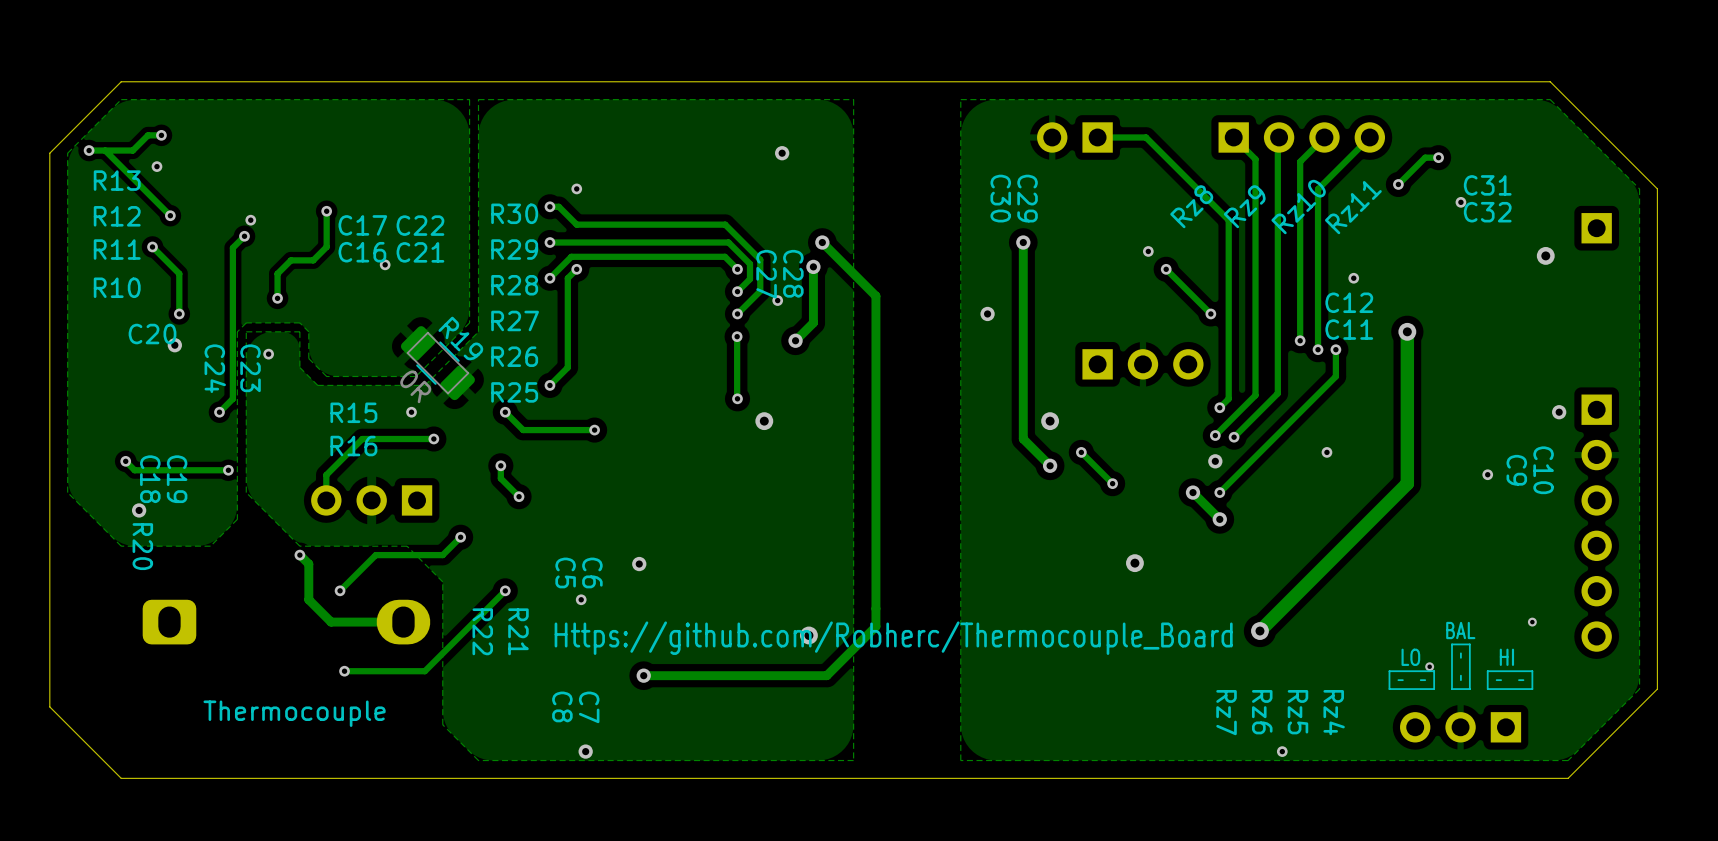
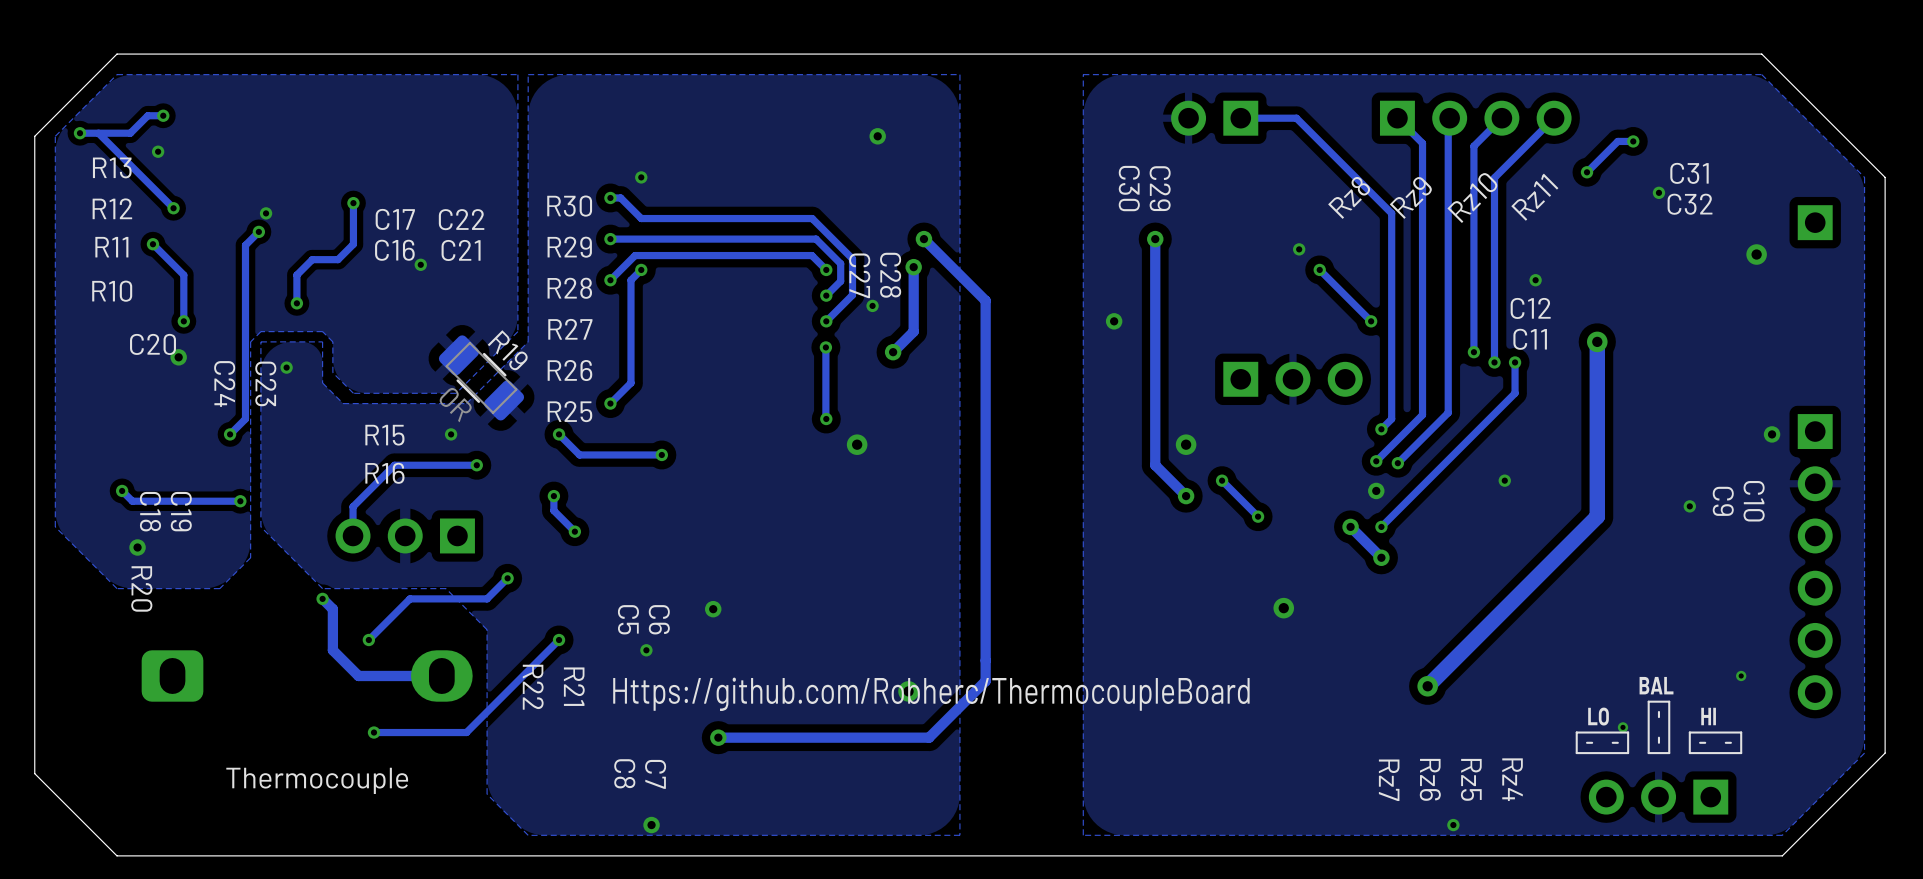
text: Https://github.com/Robherc/Thermocouple_Board (893, 638) -> Https://github.com/Robherc/ThermocoupleBoard (931, 694)

